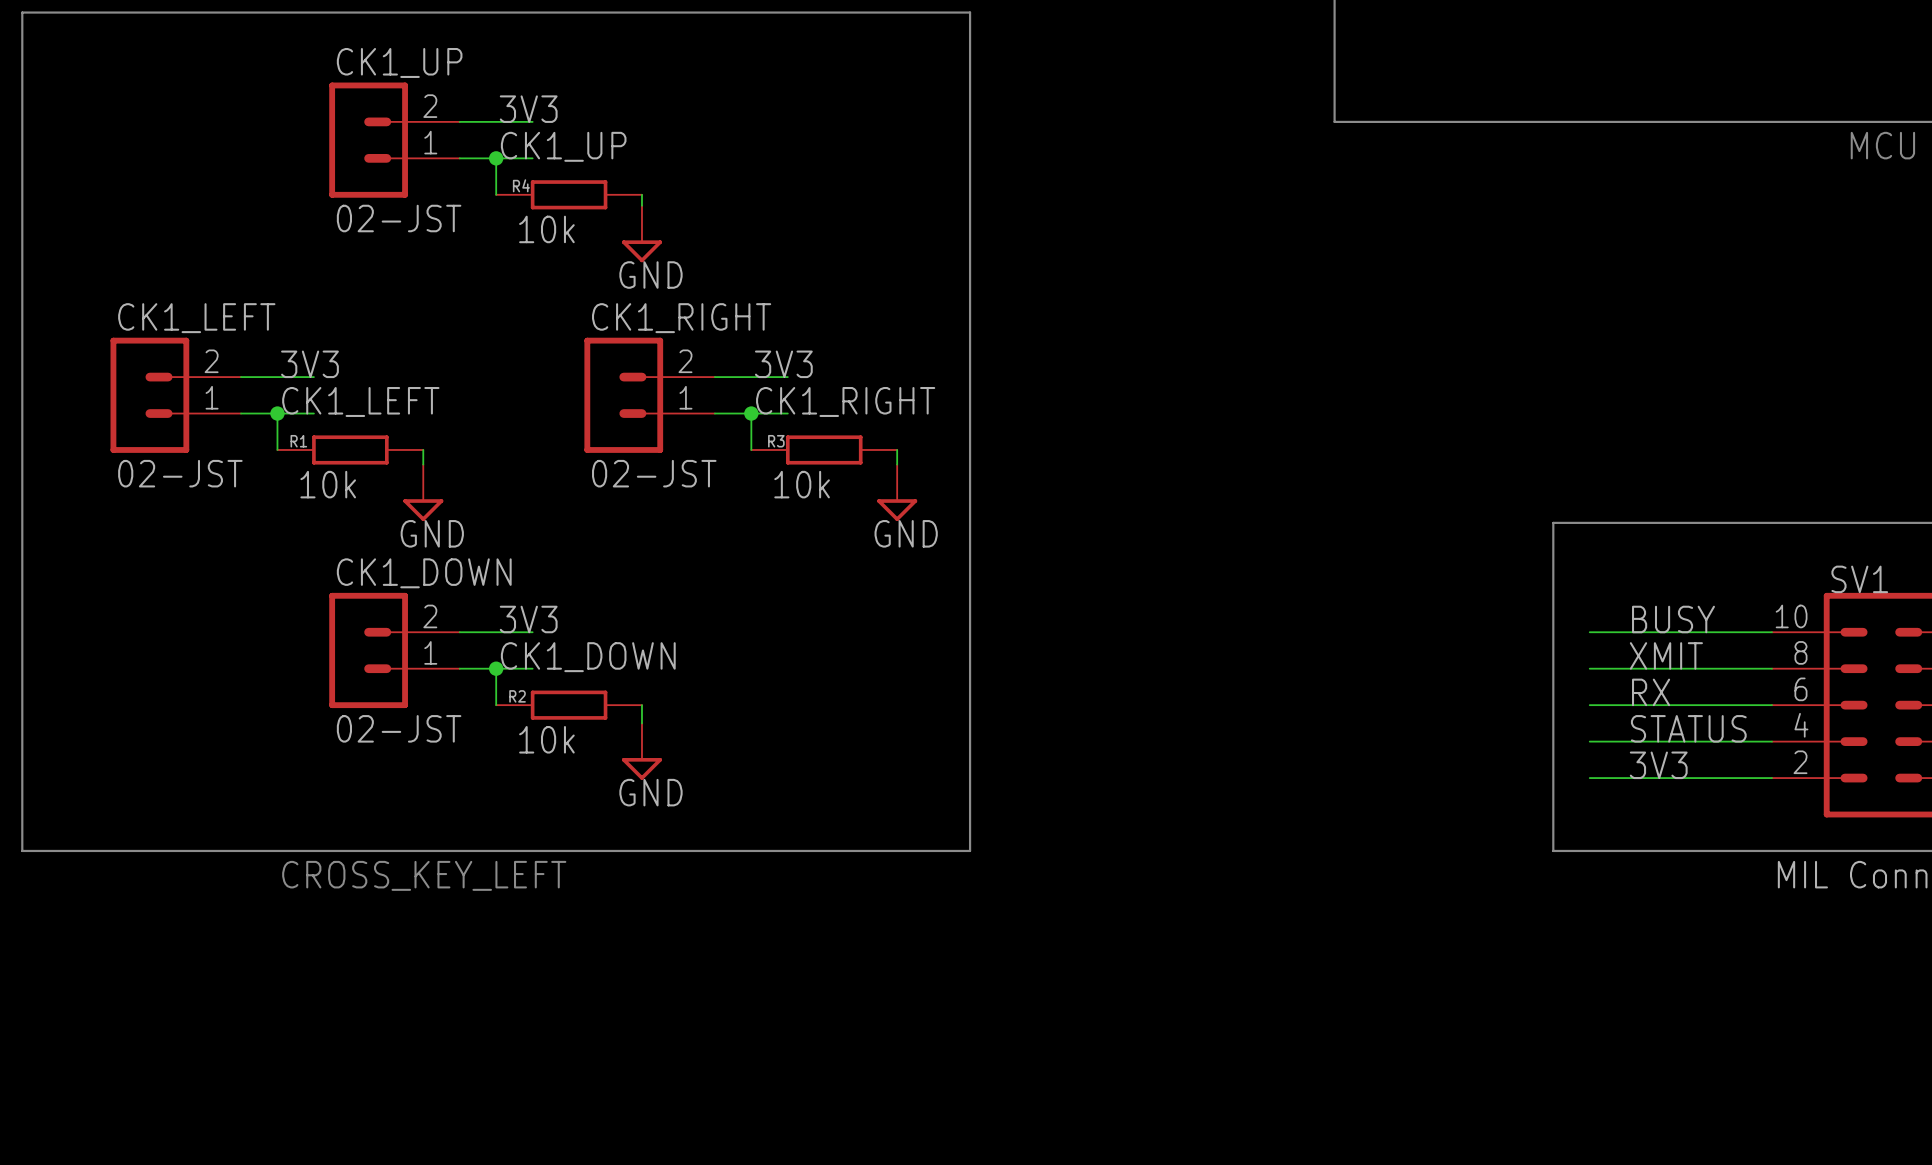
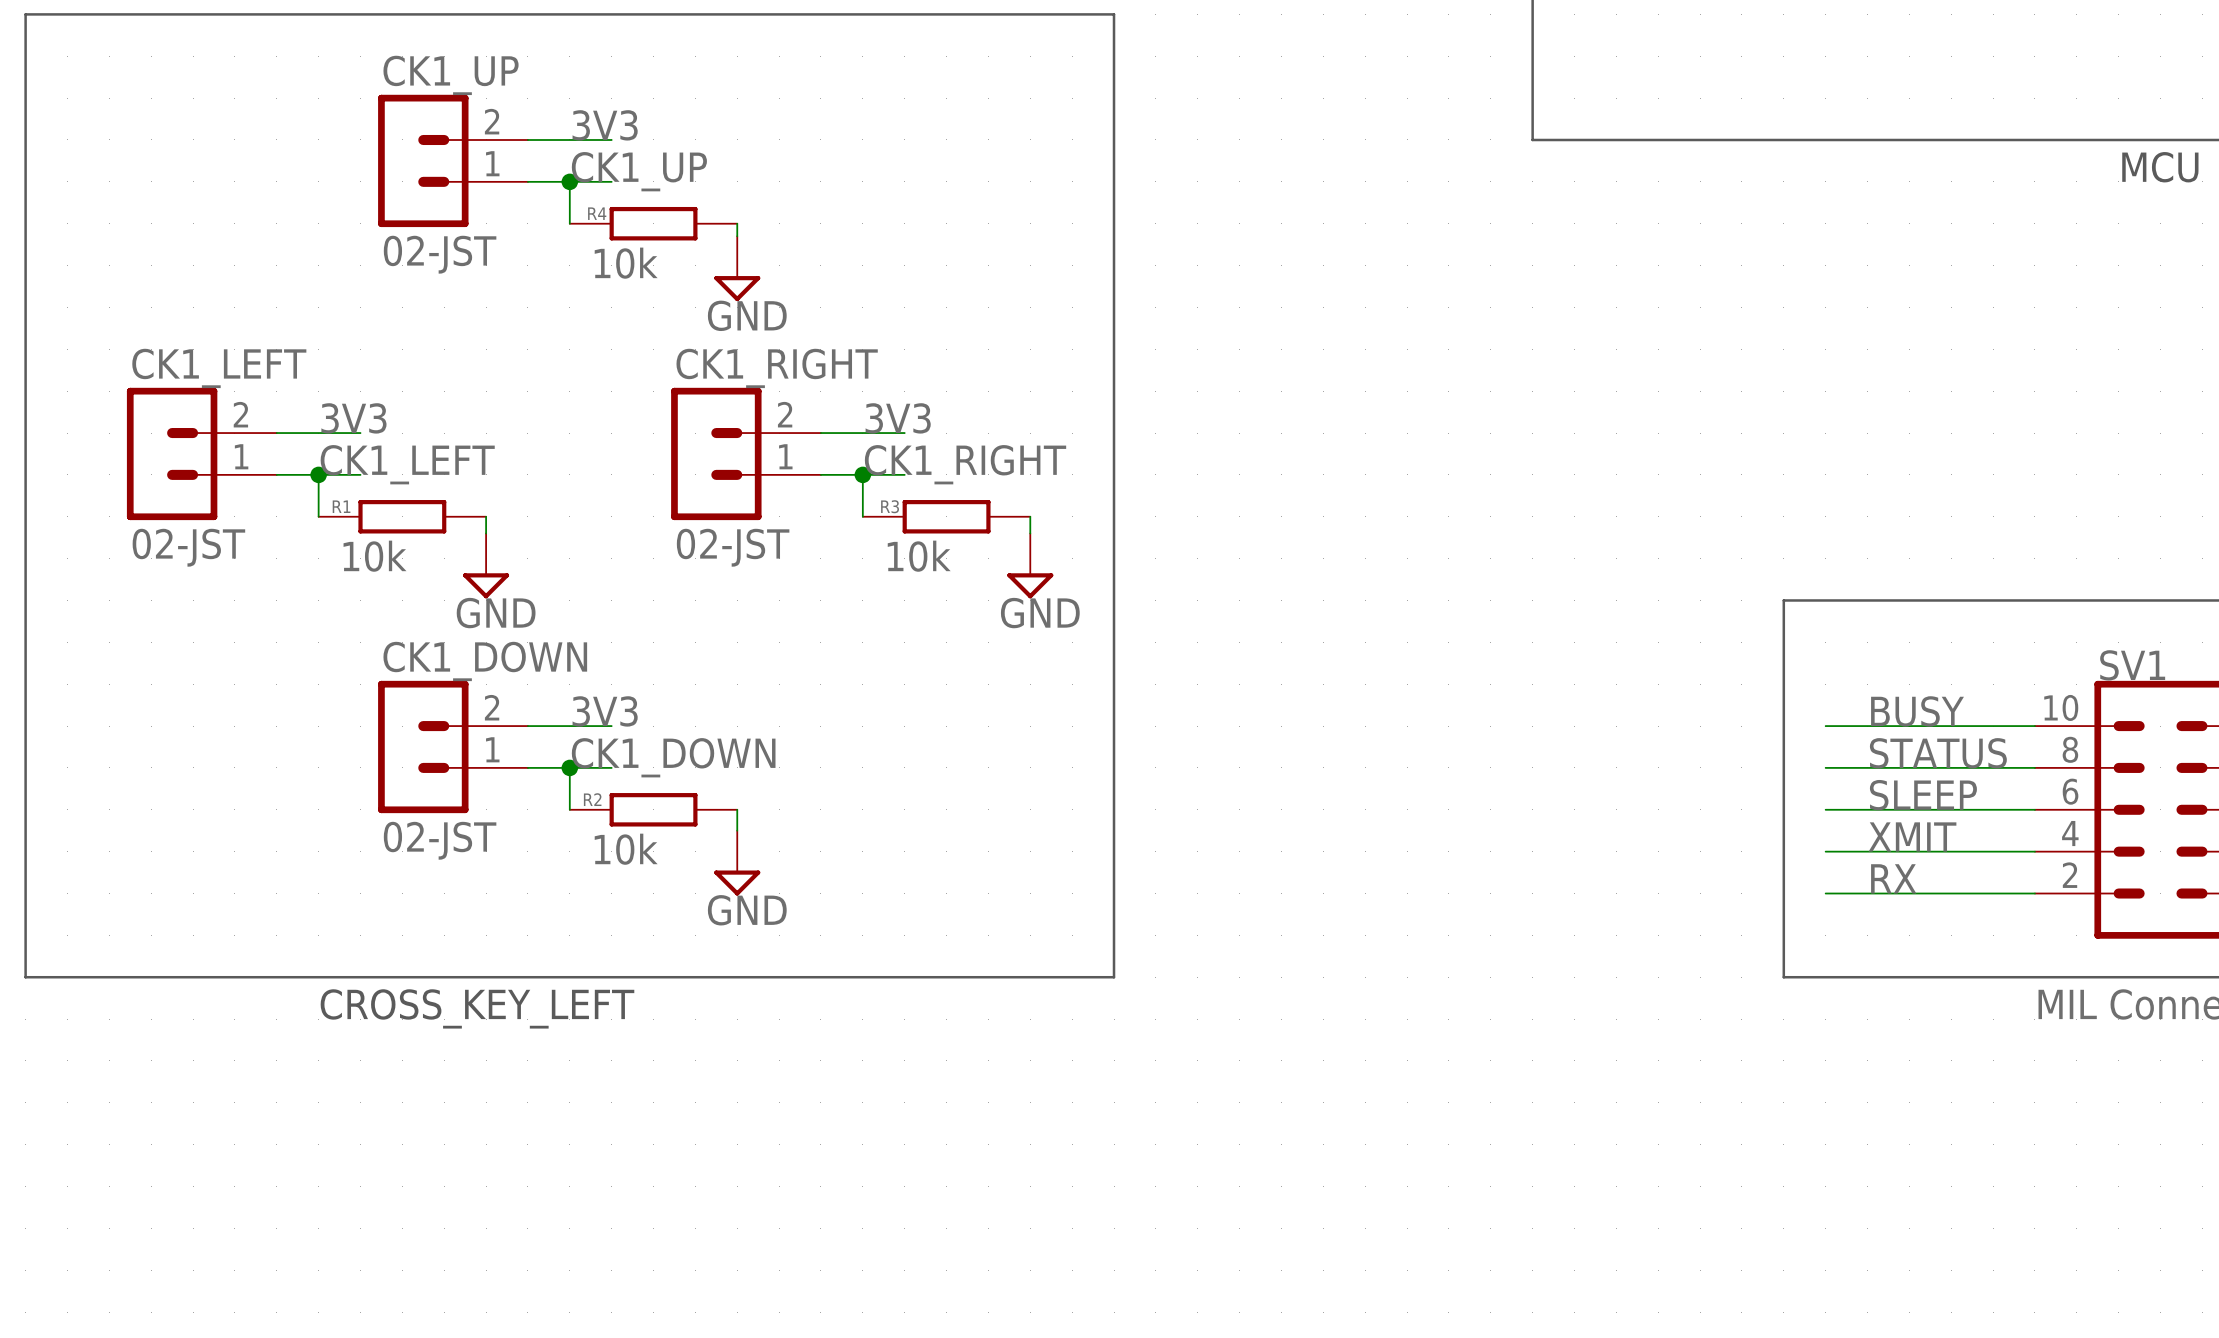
label: XMIT (1666, 655) -> STATUS (1938, 753)
label: RX (1651, 692) -> SLEEP (1923, 795)
label: STATUS (1688, 728) -> XMIT (1912, 836)
label: 3V3 (1658, 765) -> RX (1893, 878)

